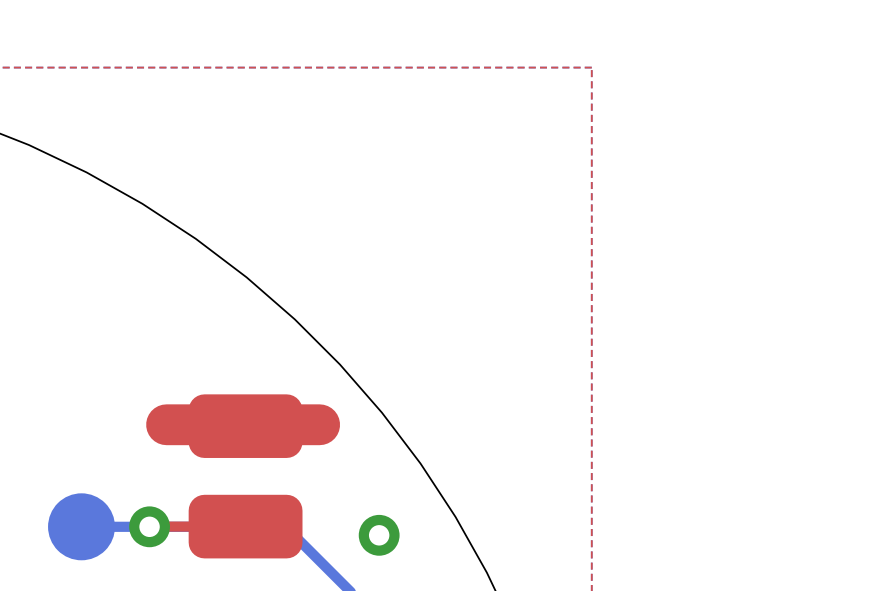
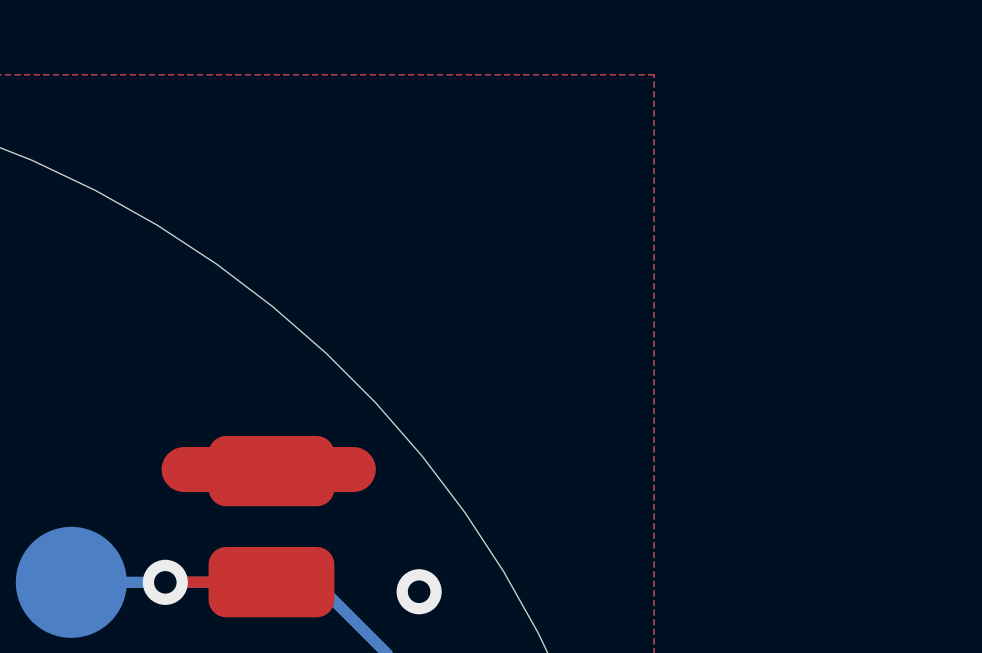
part footprint: [48, 493, 116, 561] -> [15, 526, 127, 638]

